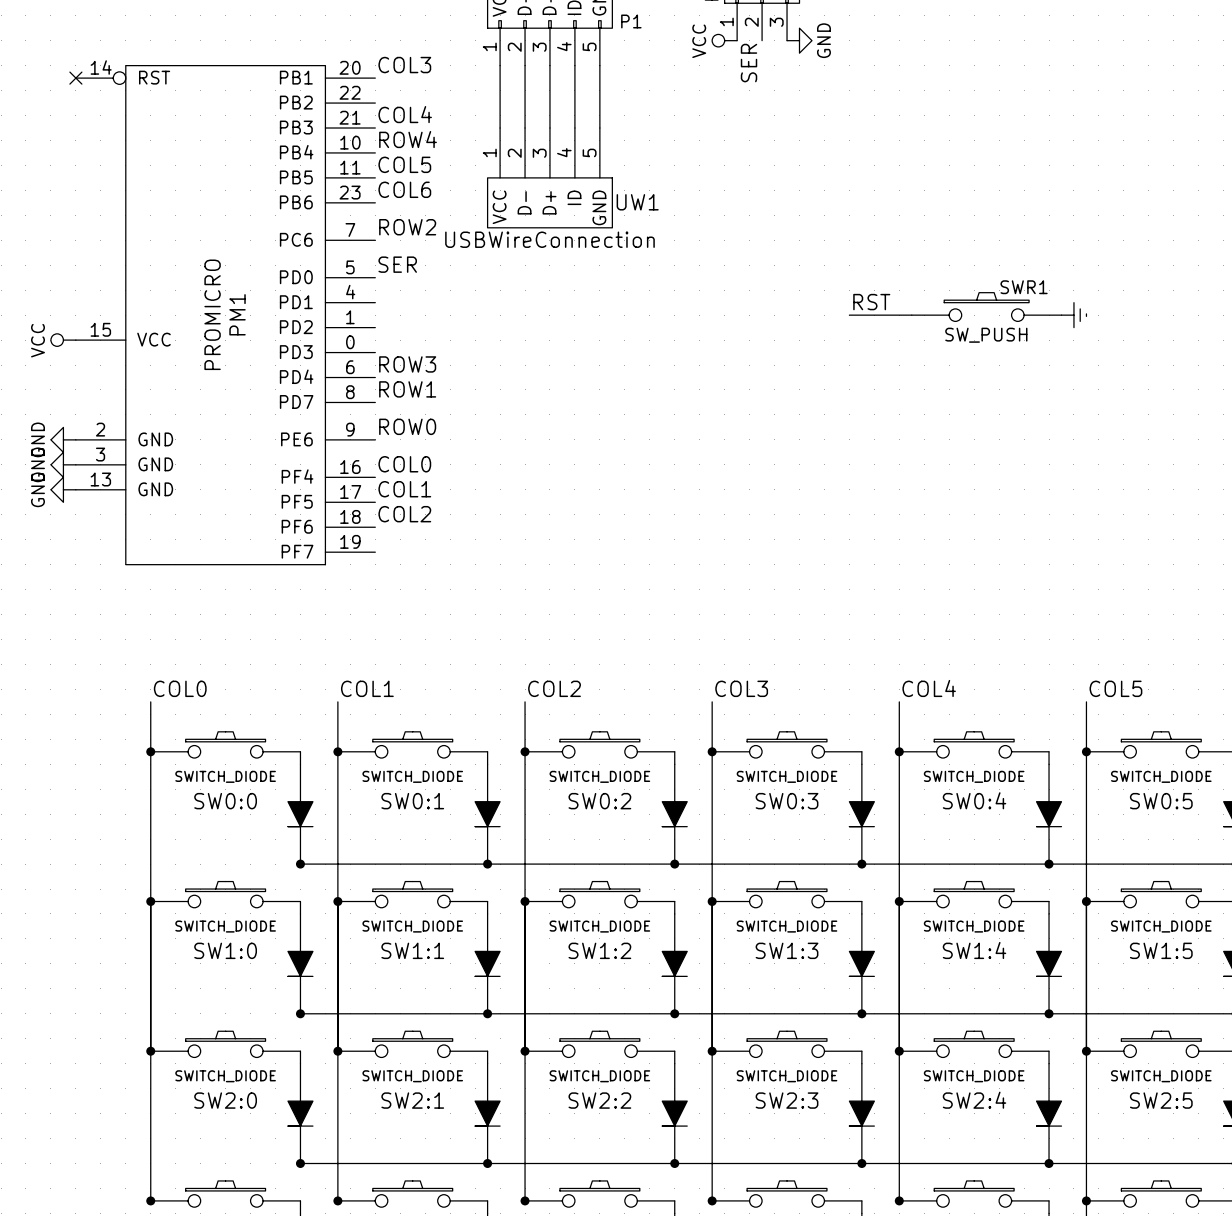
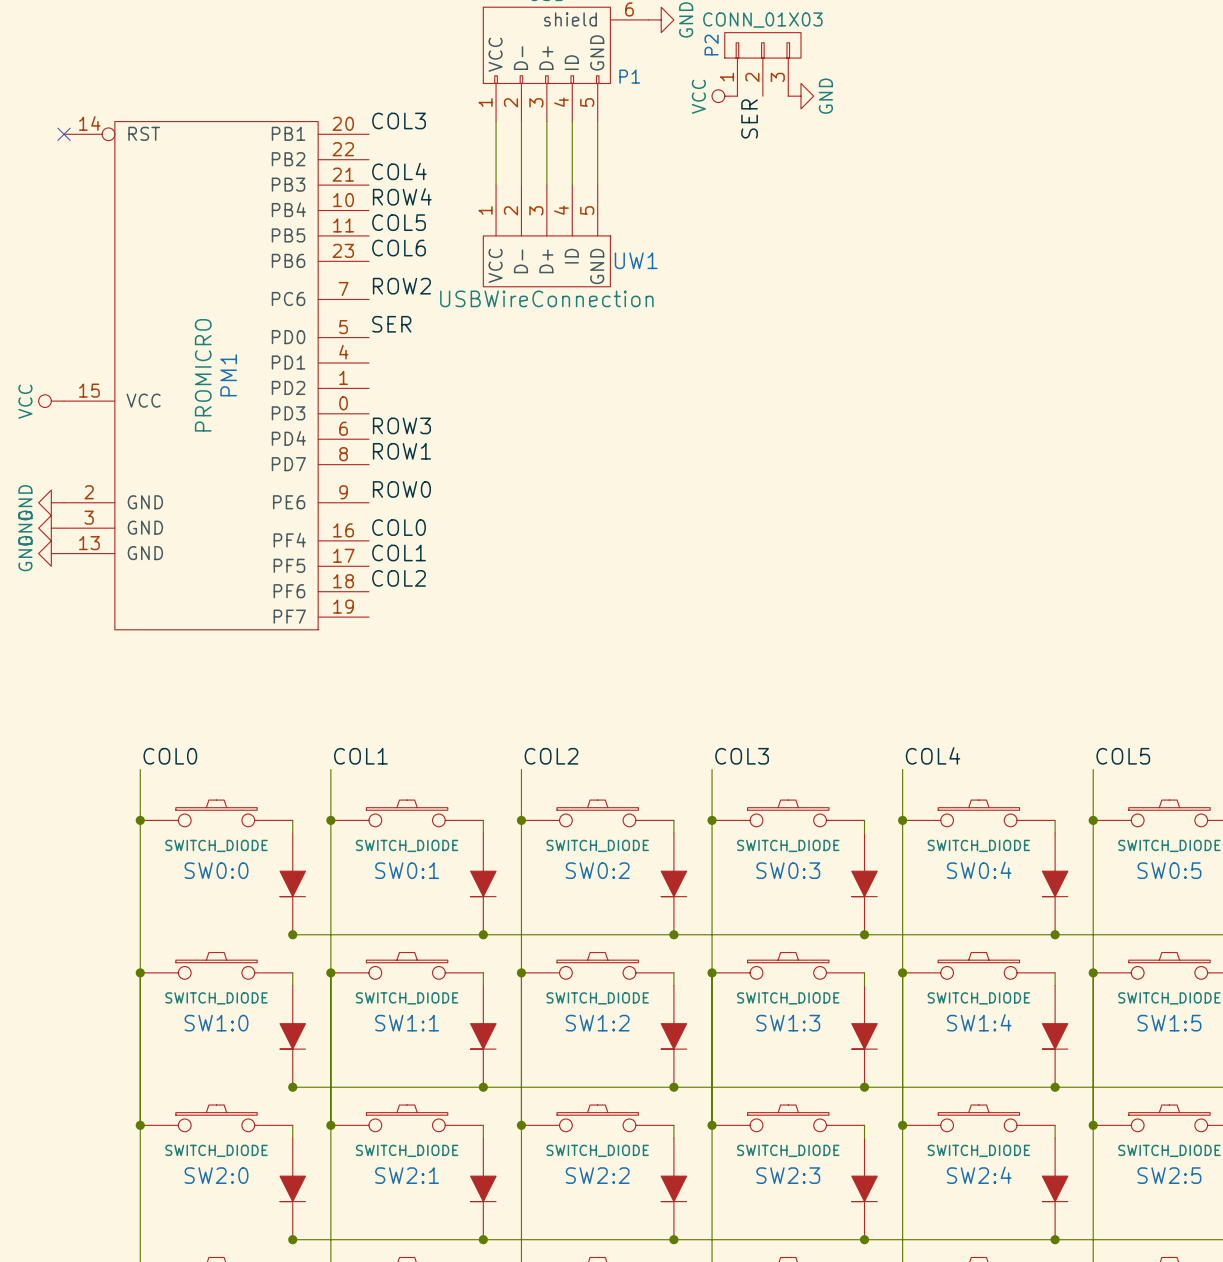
label: RST (871, 302) -> none
SWR1: SW_PUSH (986, 307) -> none
wire: (849, 315) (911, 315) -> none
power symbol: (1073, 315) -> none

